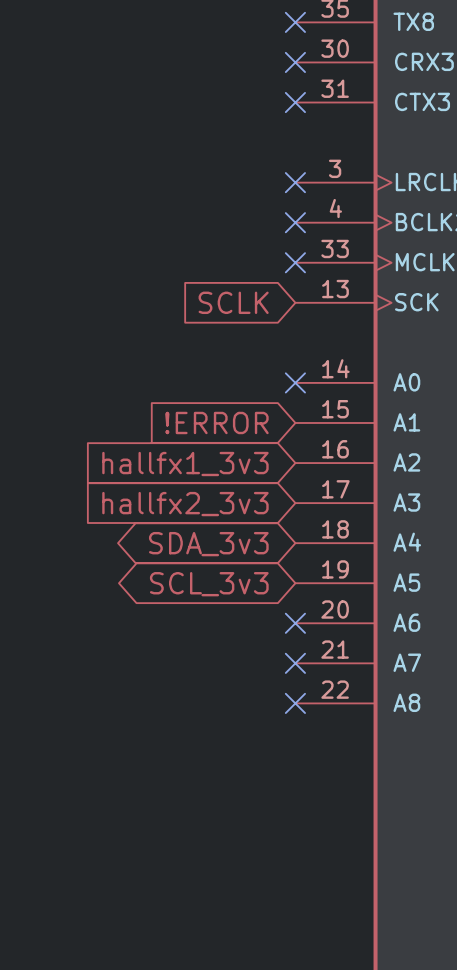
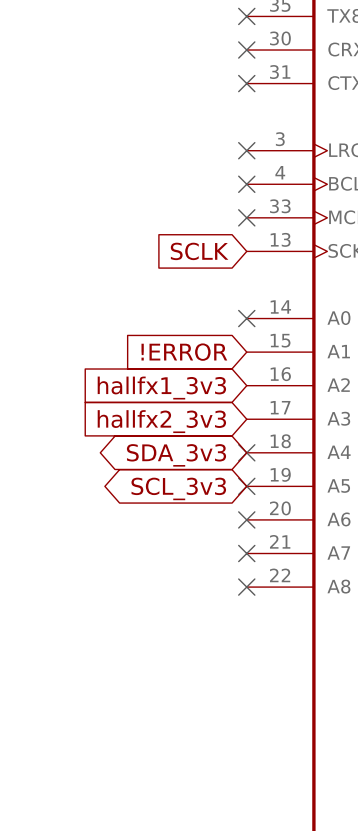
no-connect mark: none -> (246, 452)
no-connect mark: none -> (246, 486)

